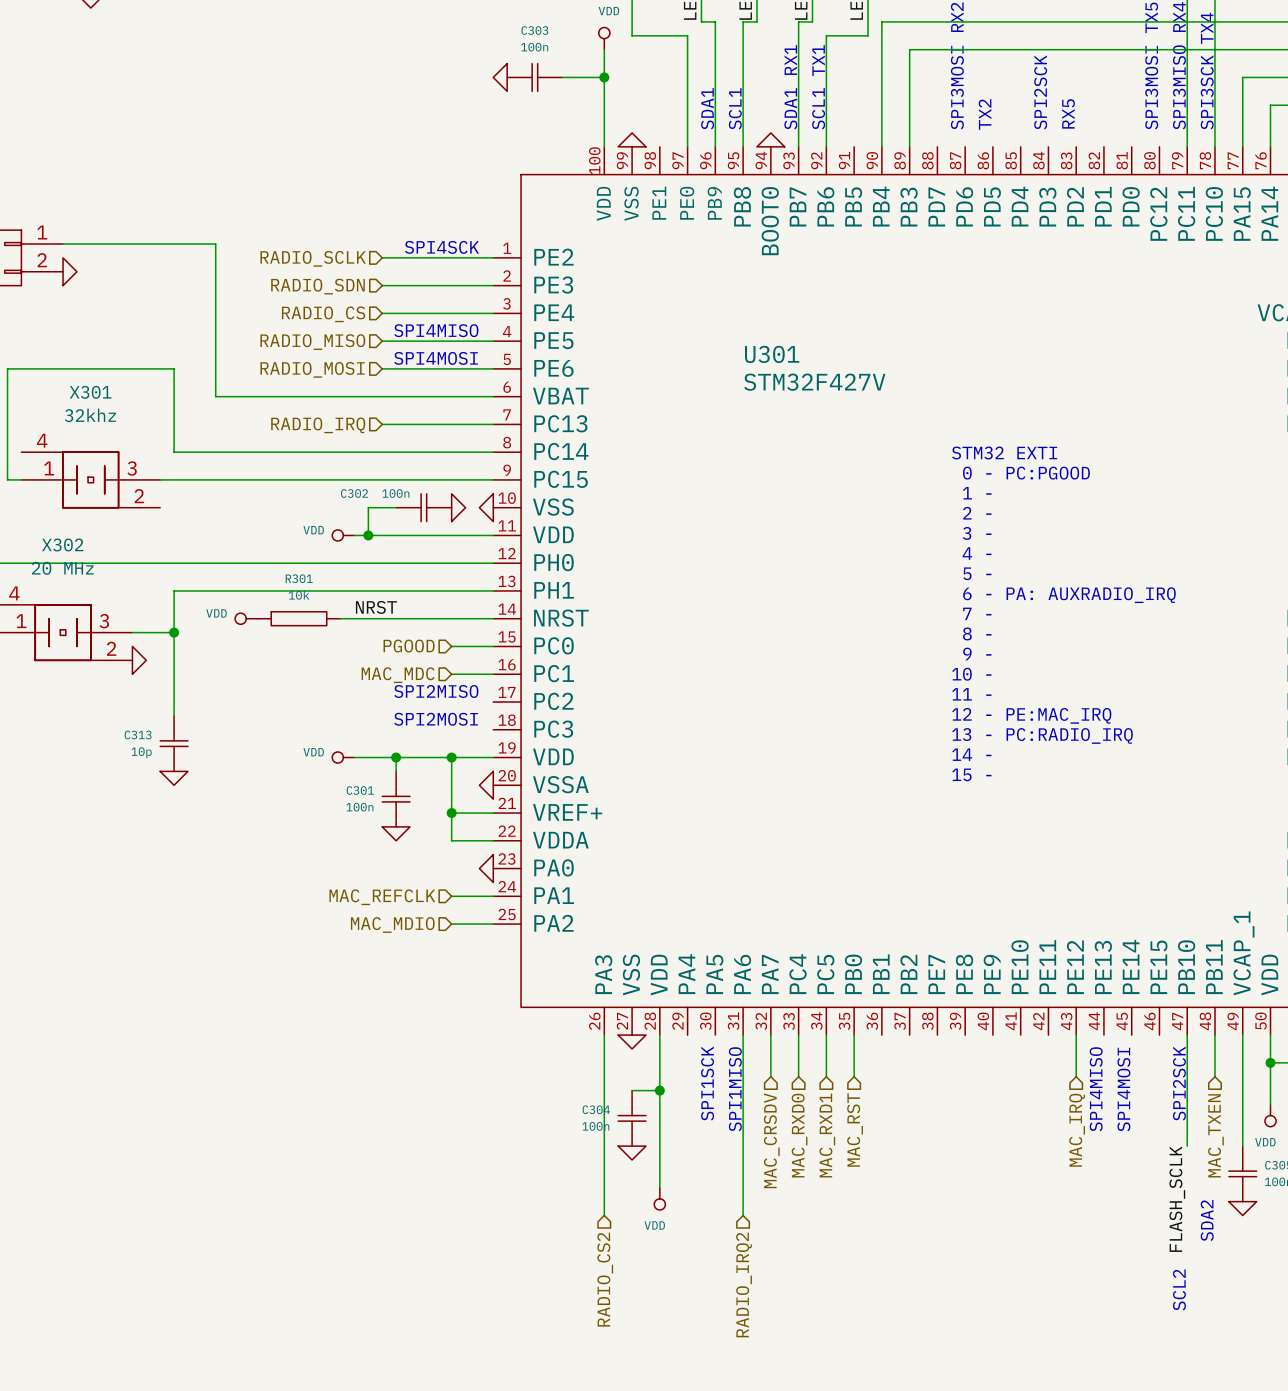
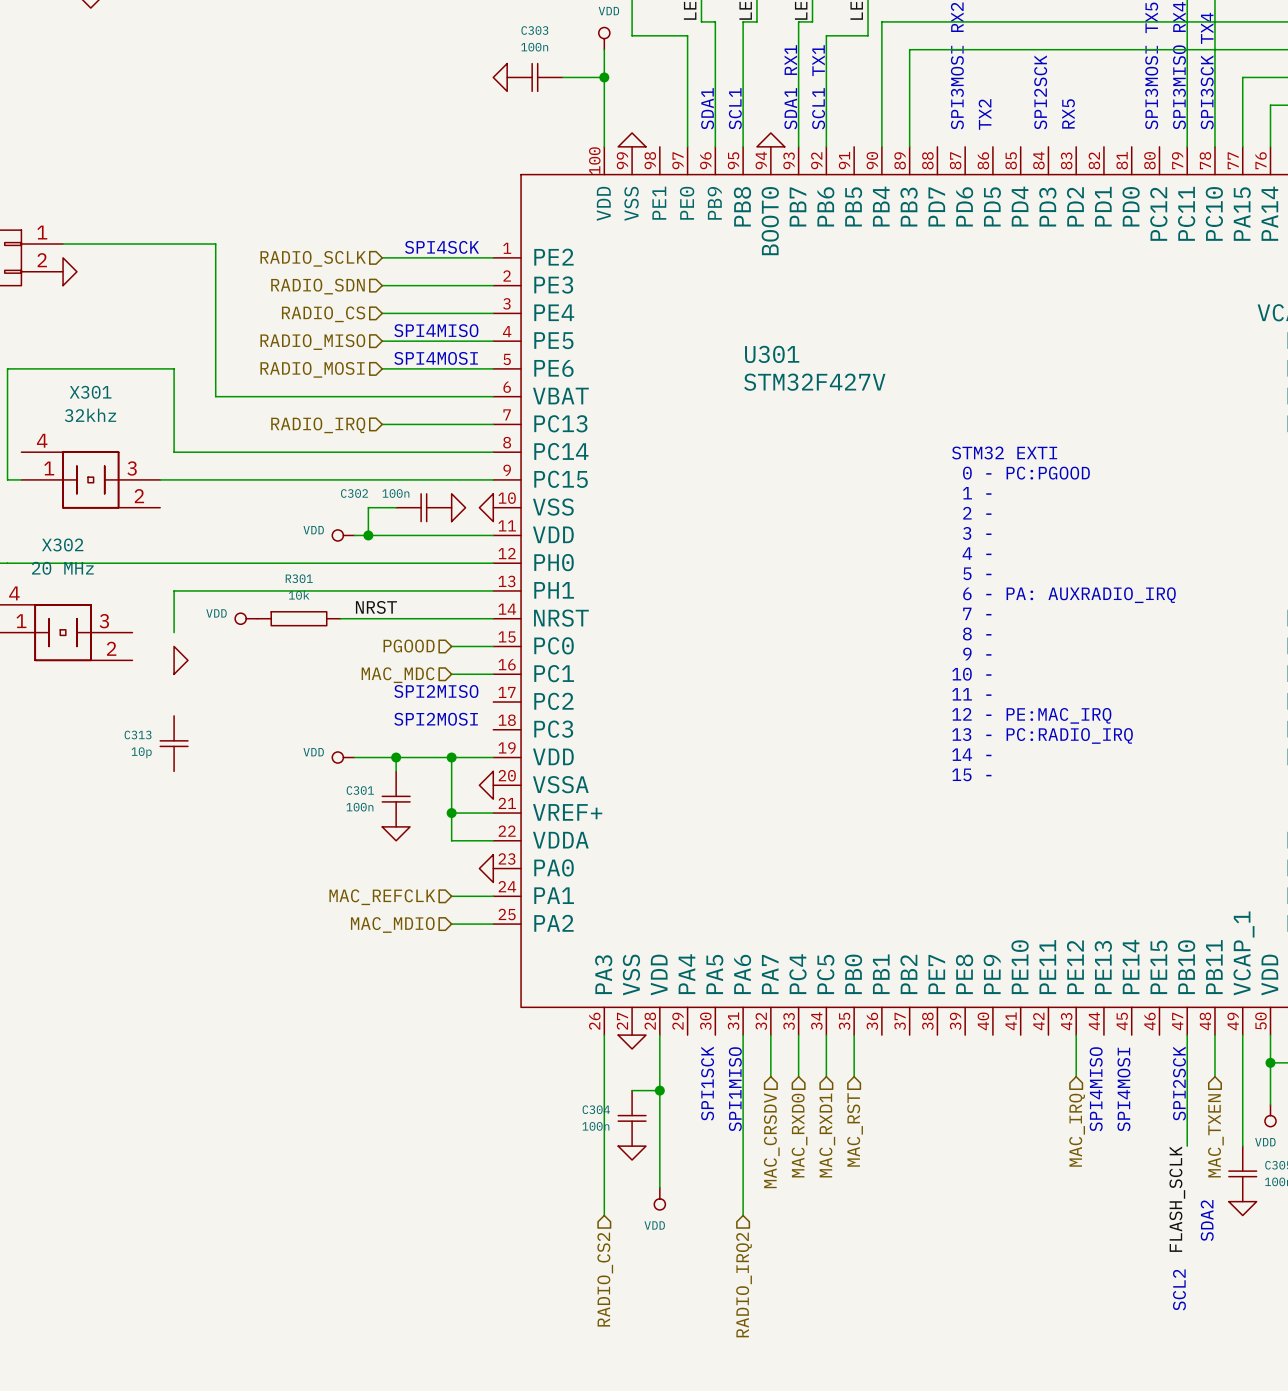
wire: (132, 632) (174, 632) (174, 715) -> none
junction: (174, 632) -> none
power symbol position: (139, 660) -> (181, 660)
power symbol: (174, 778) -> none

